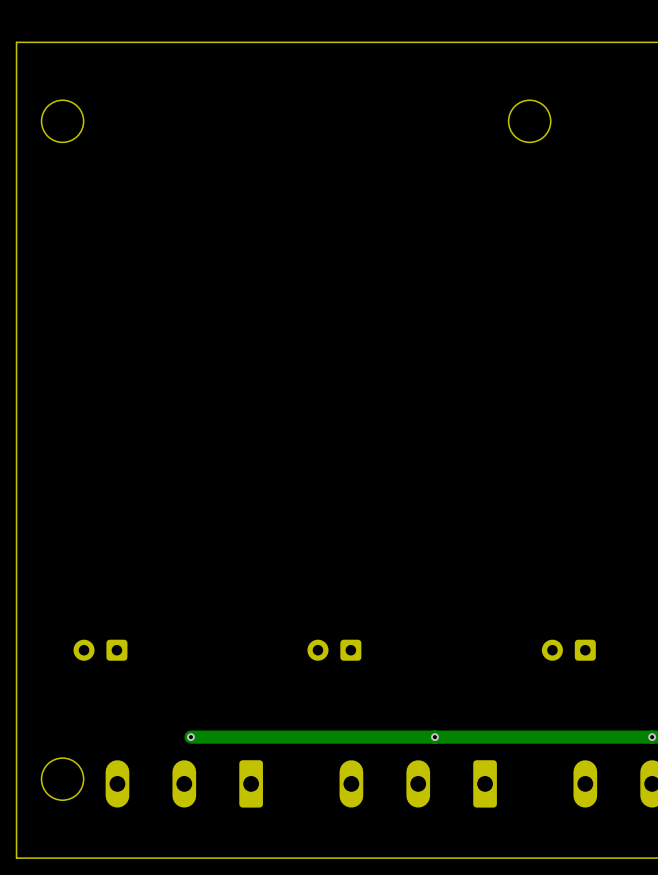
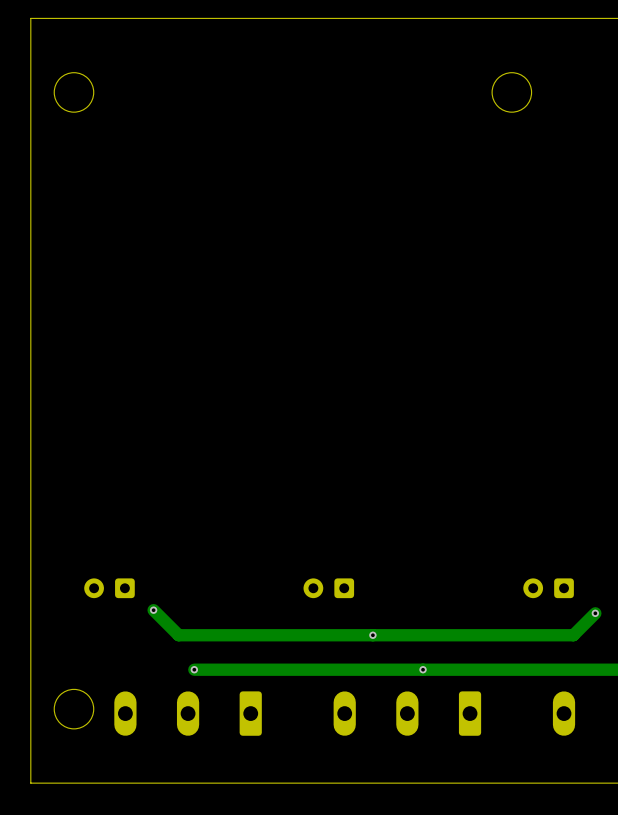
track: none -> (153, 610) (178, 635) (573, 635) (595, 613)
via: none -> (153, 610)
via: none -> (595, 613)
via: none -> (372, 635)

